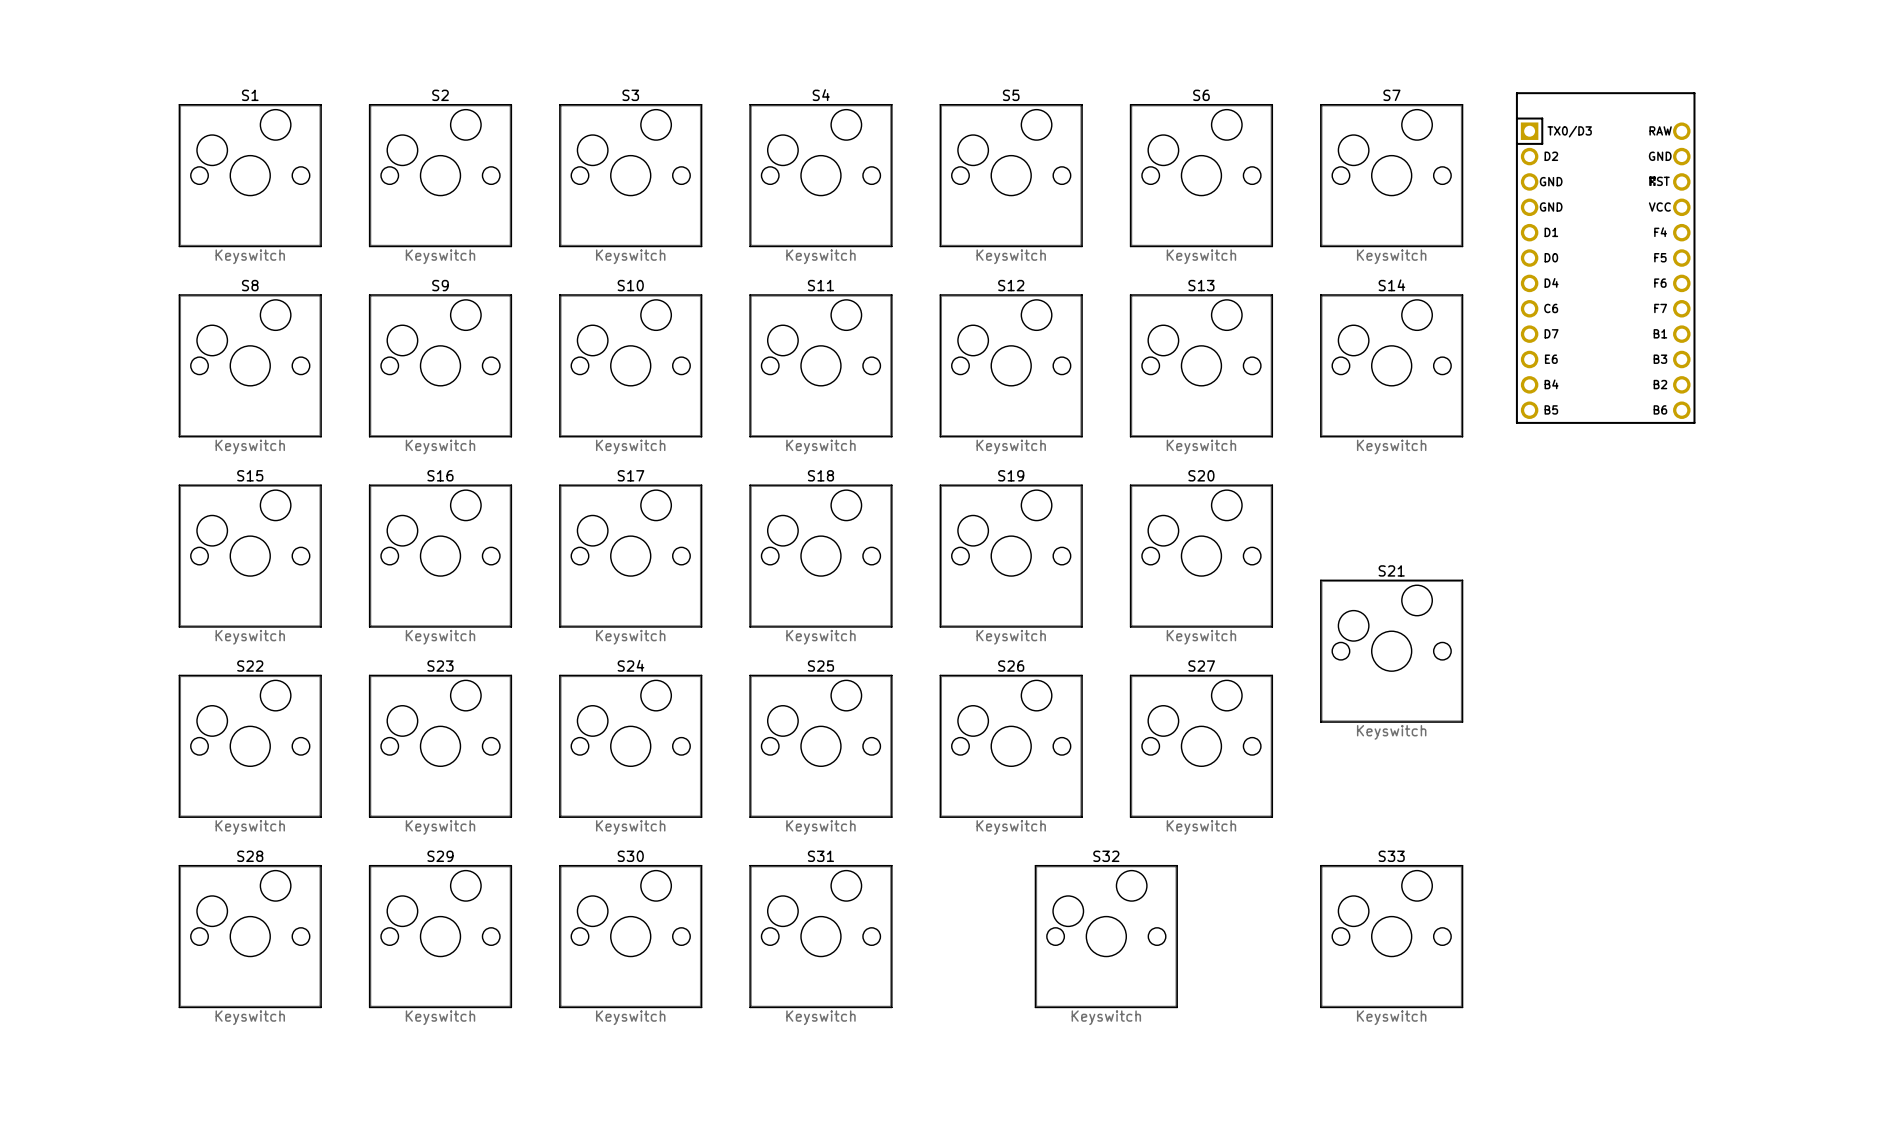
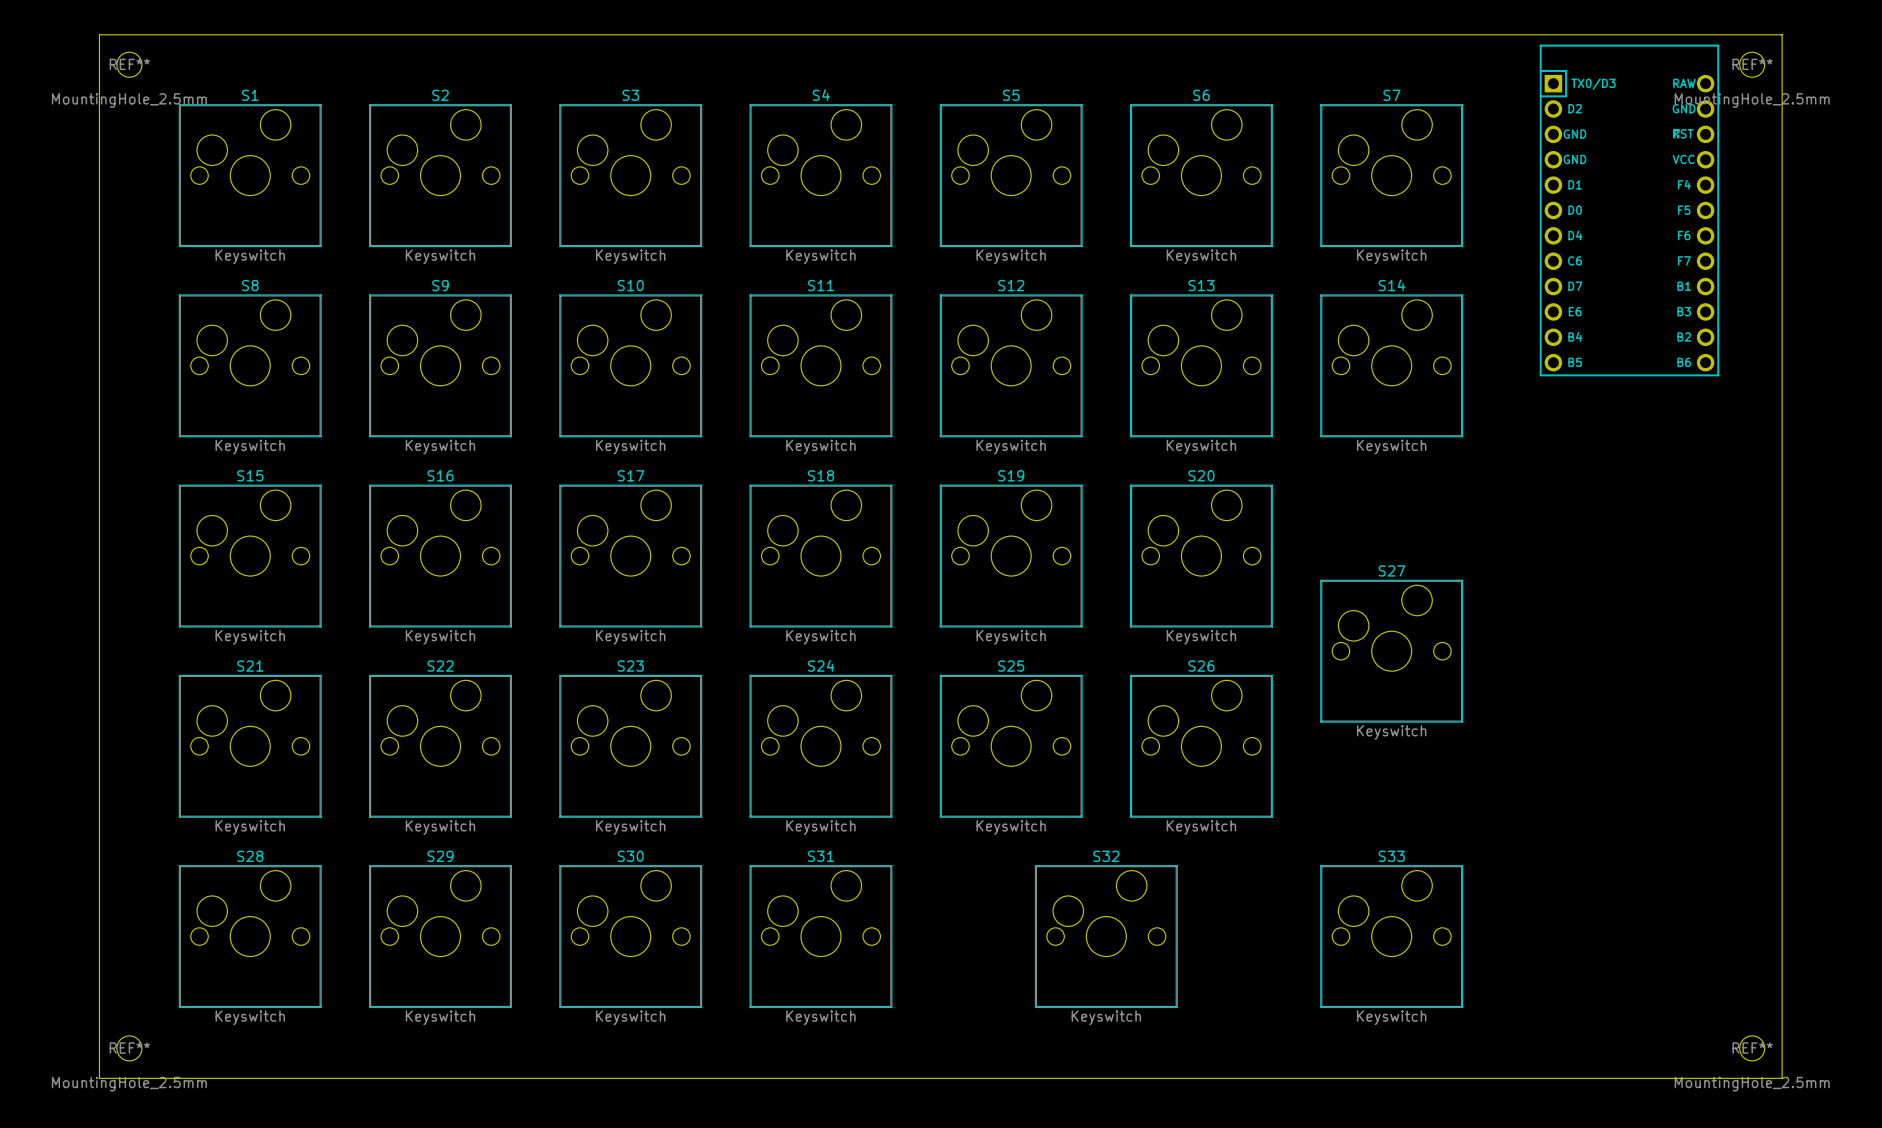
board edge: none -> (99, 34) (1782, 34) (1782, 1078) (99, 1078) (99, 34)
REF**: none -> MountingHole_2.5mm (129, 64)
REF**: none -> MountingHole_2.5mm (1752, 64)
part position: (1605, 258) -> (1629, 210)
S21 name: S21 (1391, 570) -> S27 (1391, 570)
S24 name: S24 (630, 665) -> S23 (630, 666)
S22 name: S22 (250, 666) -> S21 (250, 666)
S23 name: S23 (440, 666) -> S22 (440, 666)
S25 name: S25 (820, 666) -> S24 (821, 665)
S26 name: S26 (1011, 666) -> S25 (1011, 666)
S27 name: S27 (1201, 666) -> S26 (1201, 666)
REF**: none -> MountingHole_2.5mm (129, 1048)
REF**: none -> MountingHole_2.5mm (1752, 1048)

